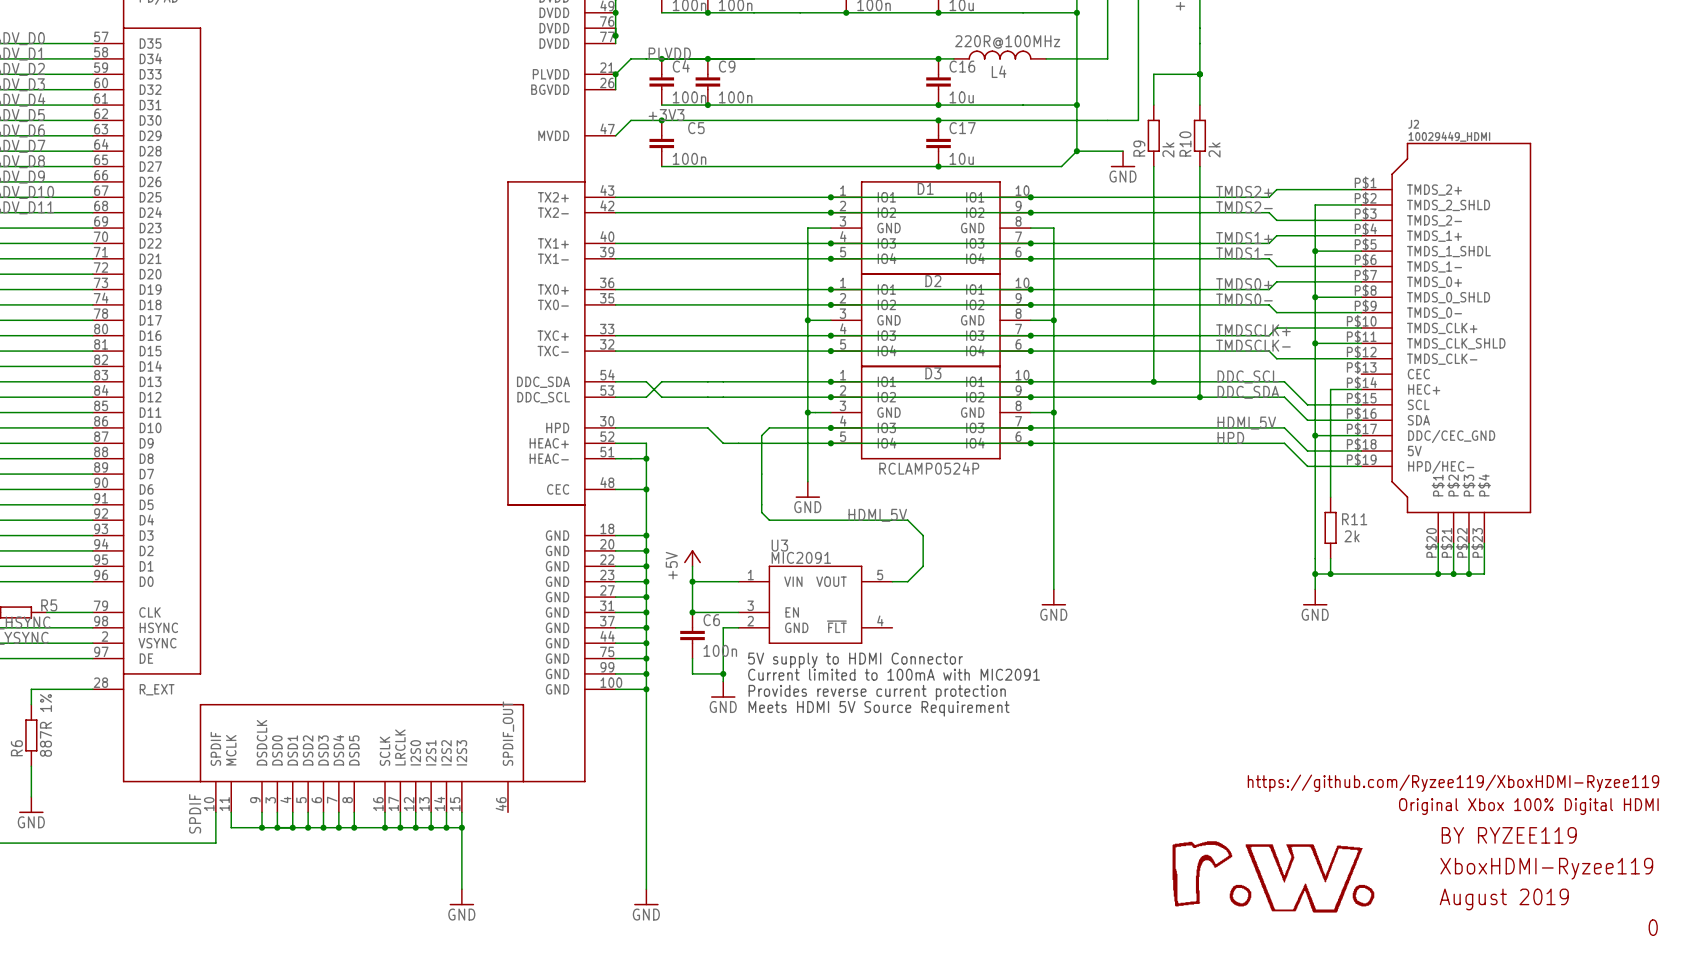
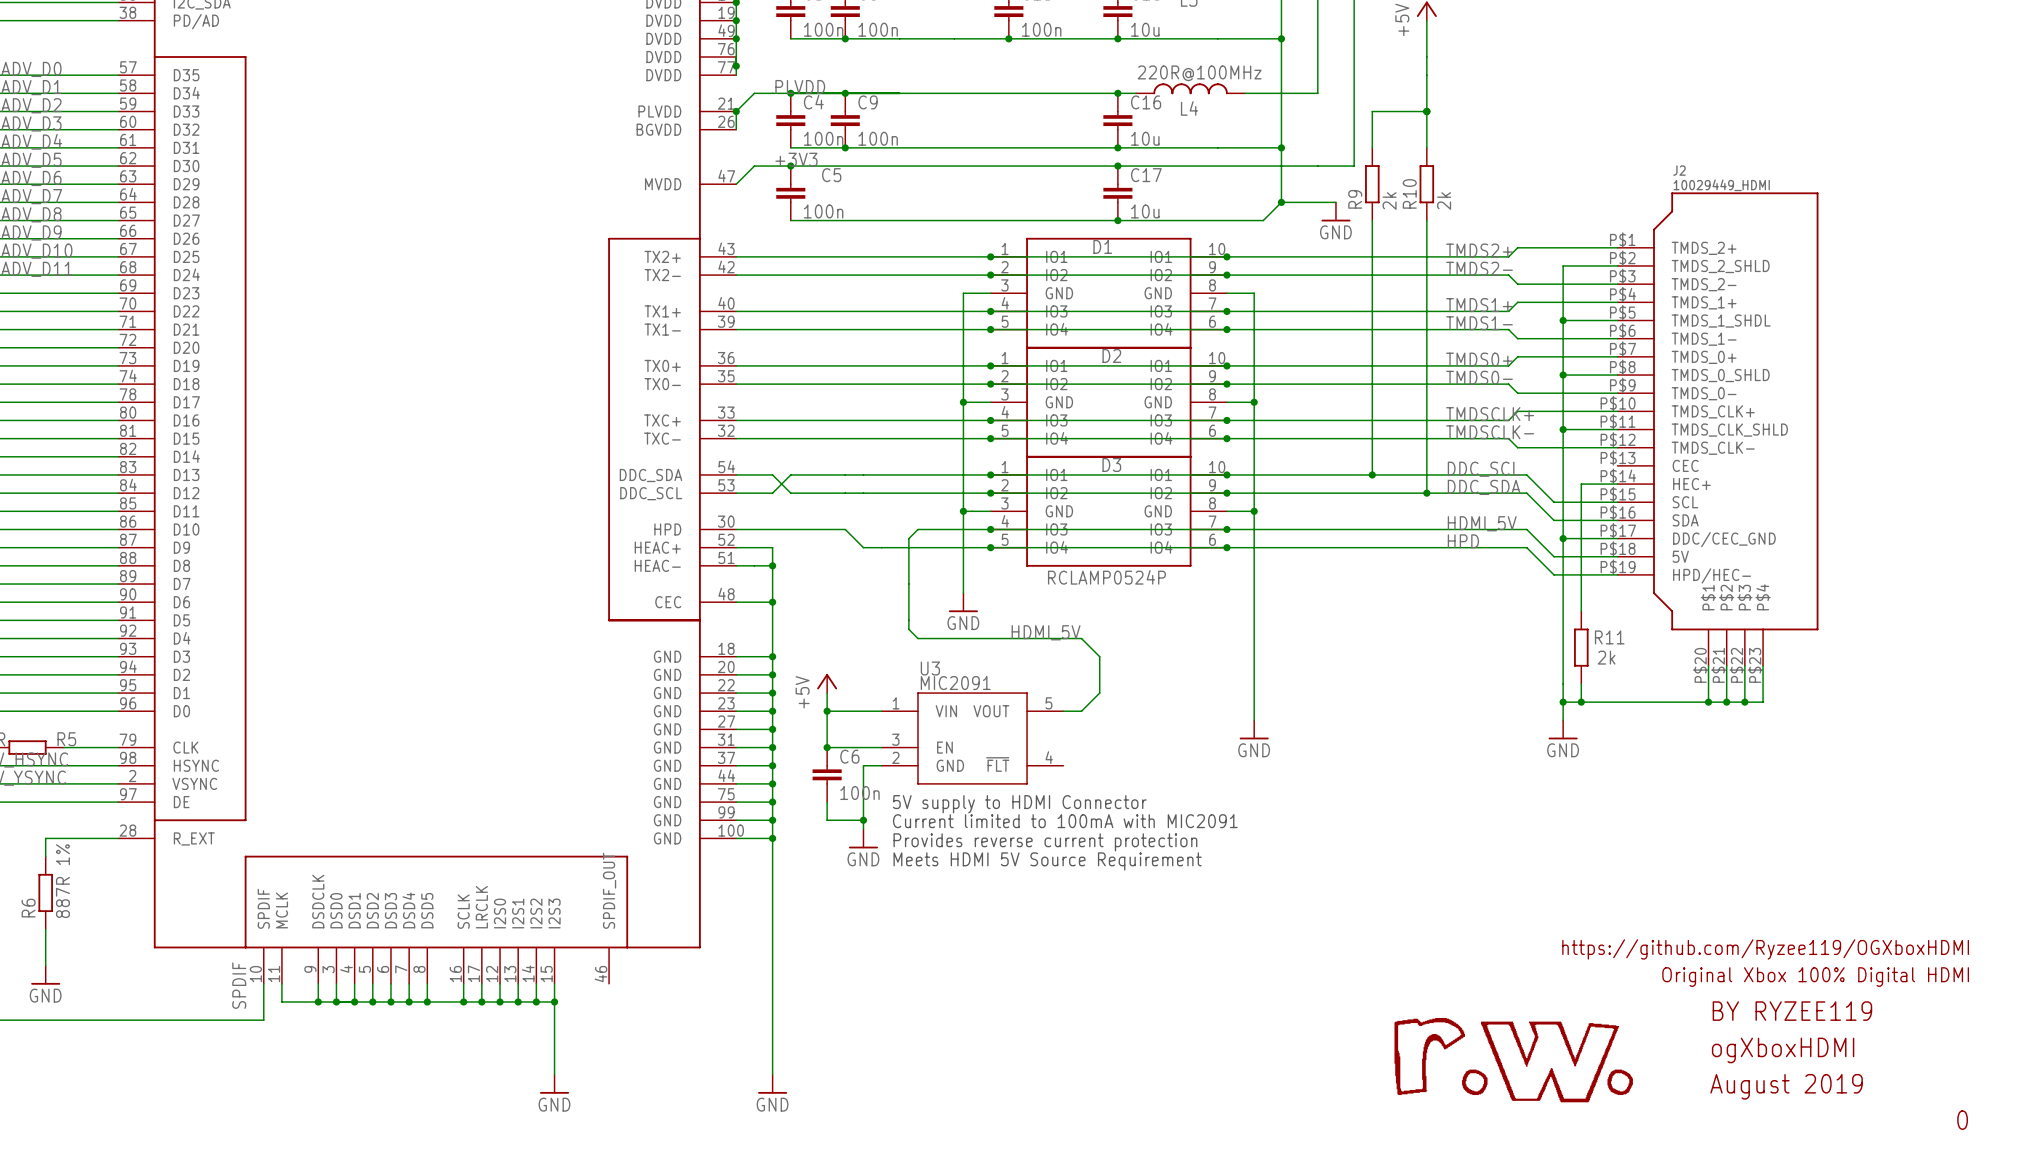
text: https://github.com/Ryzee119/XboxHDMI-Ryzee119 (1453, 783) -> https://github.com/Ryzee119/OGXboxHDMI (1765, 949)
text: XboxHDMI-Ryzee119 (1546, 868) -> ogXboxHDMI (1783, 1050)

